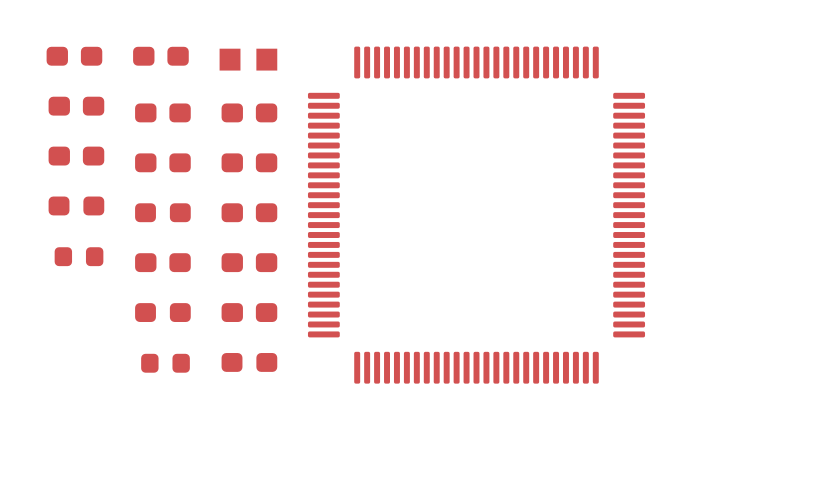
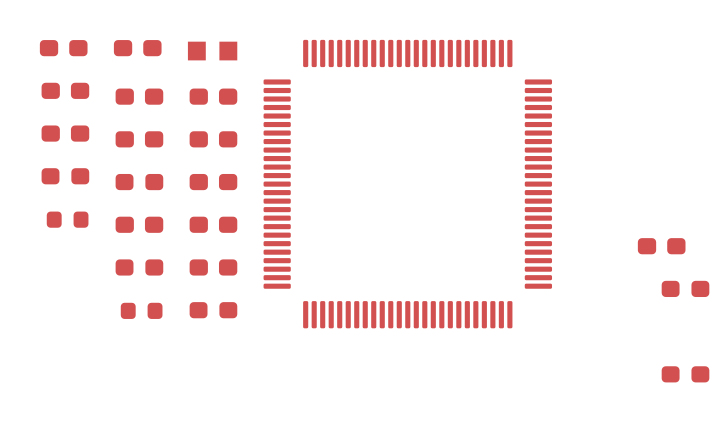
part: none -> (661, 246)
part: none -> (685, 288)
part: none -> (685, 374)

